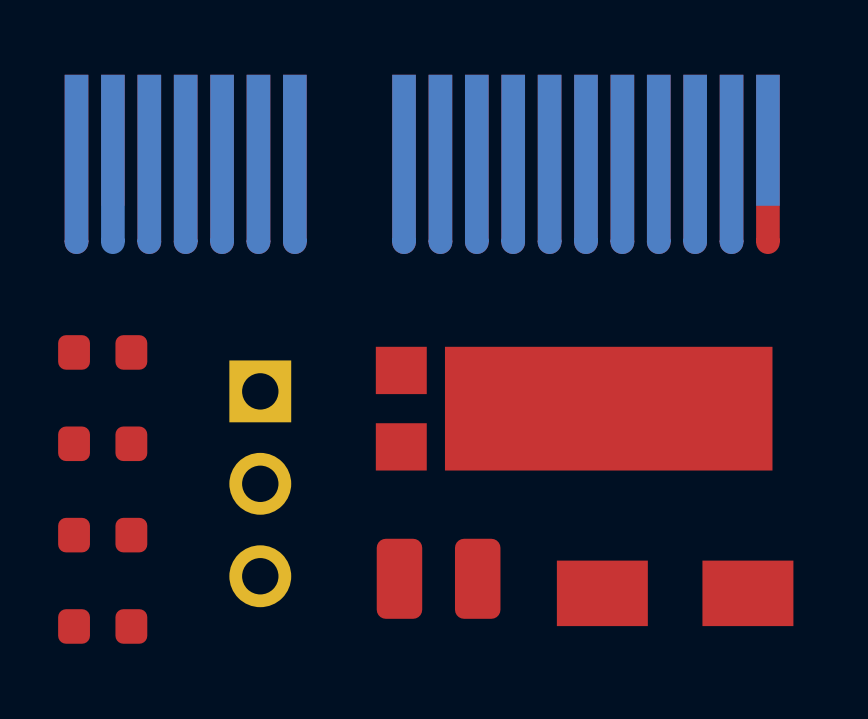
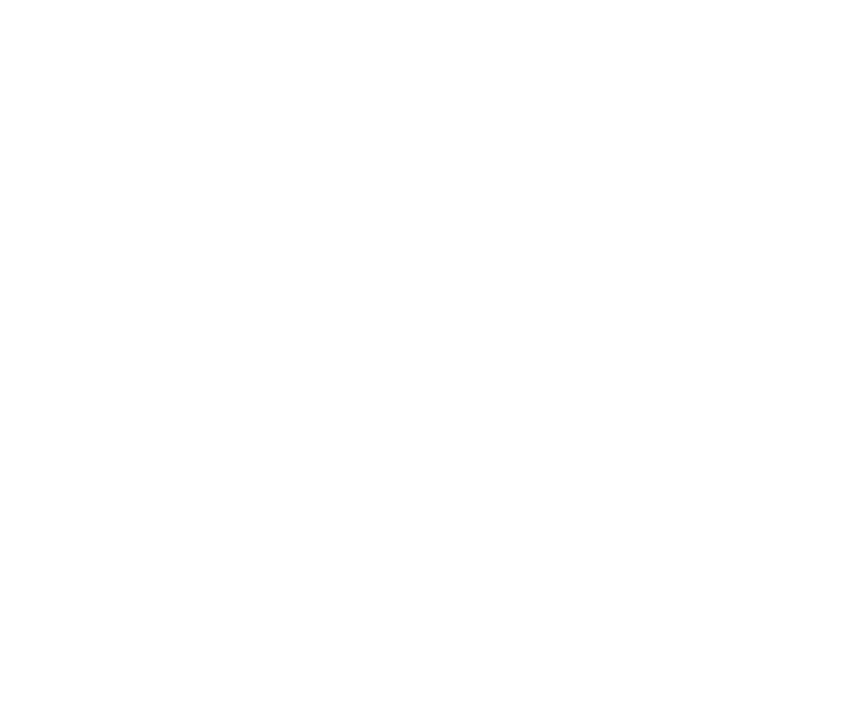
part: (422, 164) -> none
part: (102, 352) -> none
part: (574, 408) -> none
part: (102, 443) -> none
part: (260, 483) -> none
part: (102, 535) -> none
part: (438, 578) -> none
part: (675, 593) -> none
part: (102, 626) -> none

